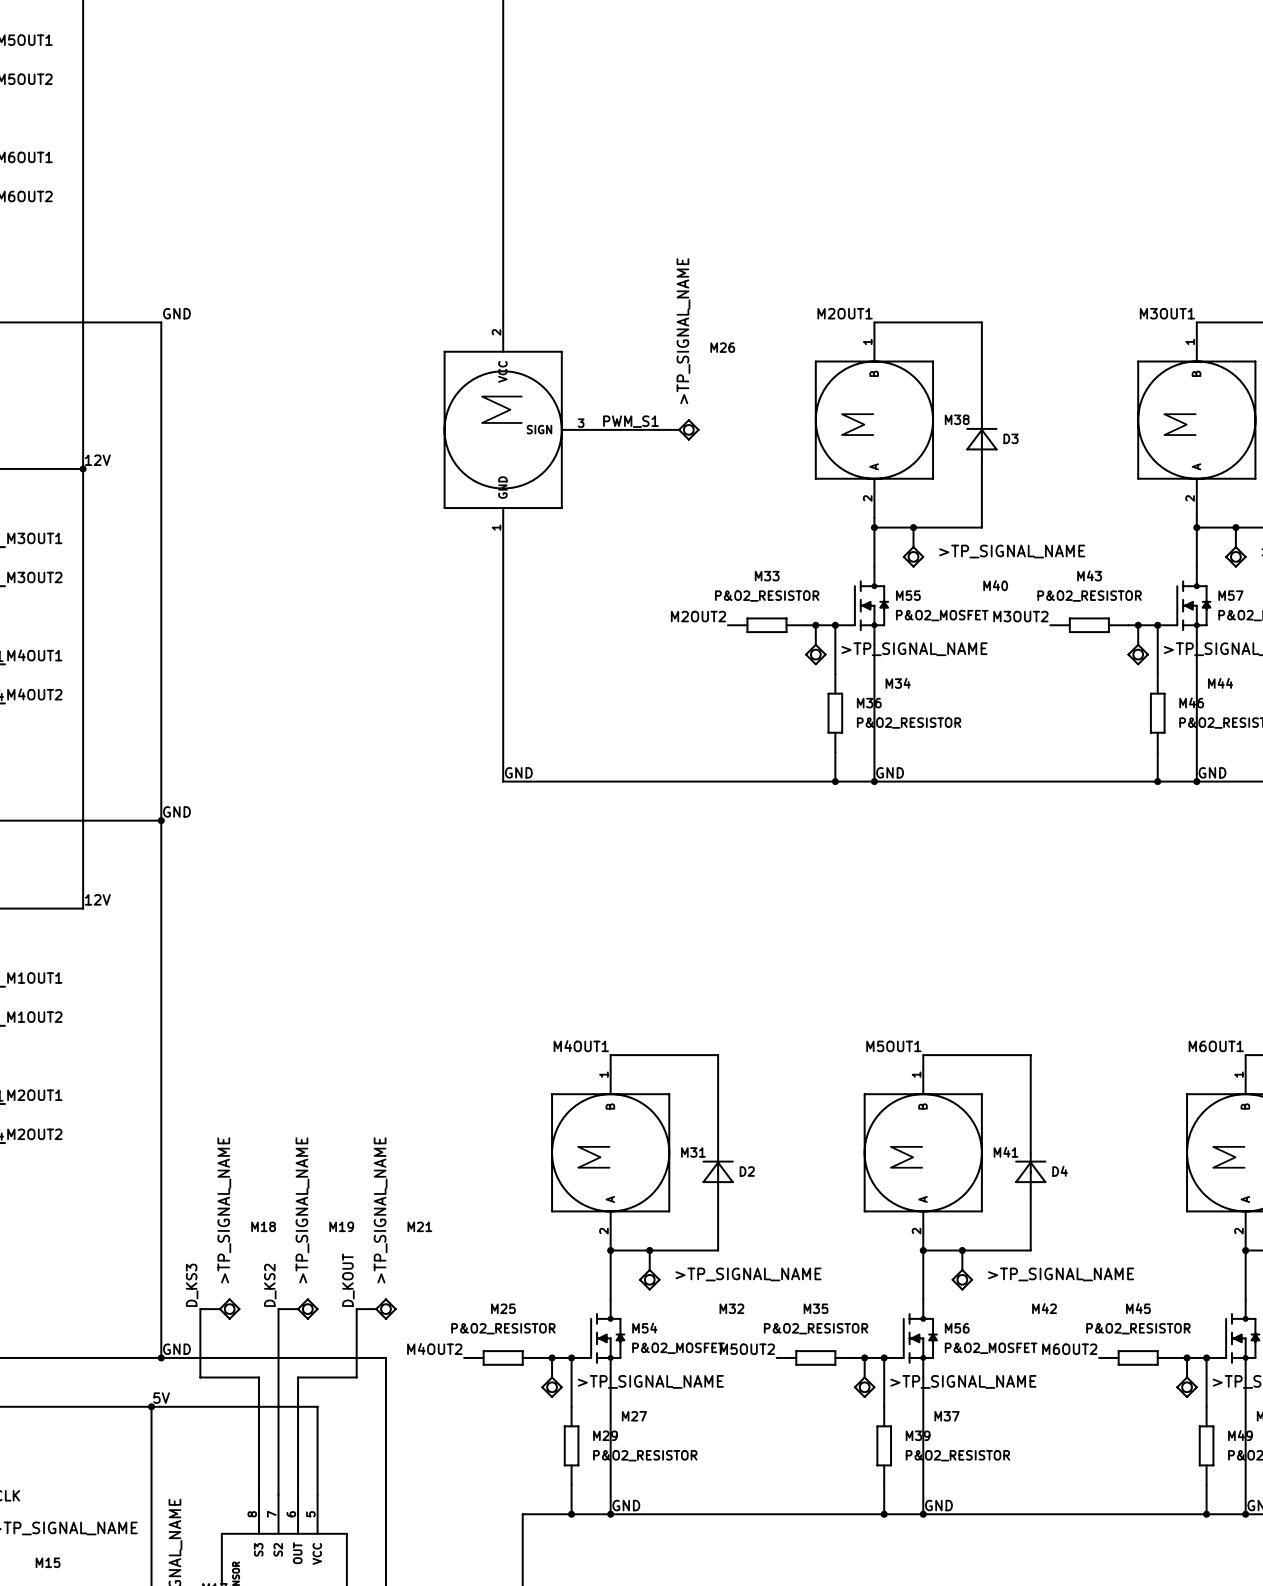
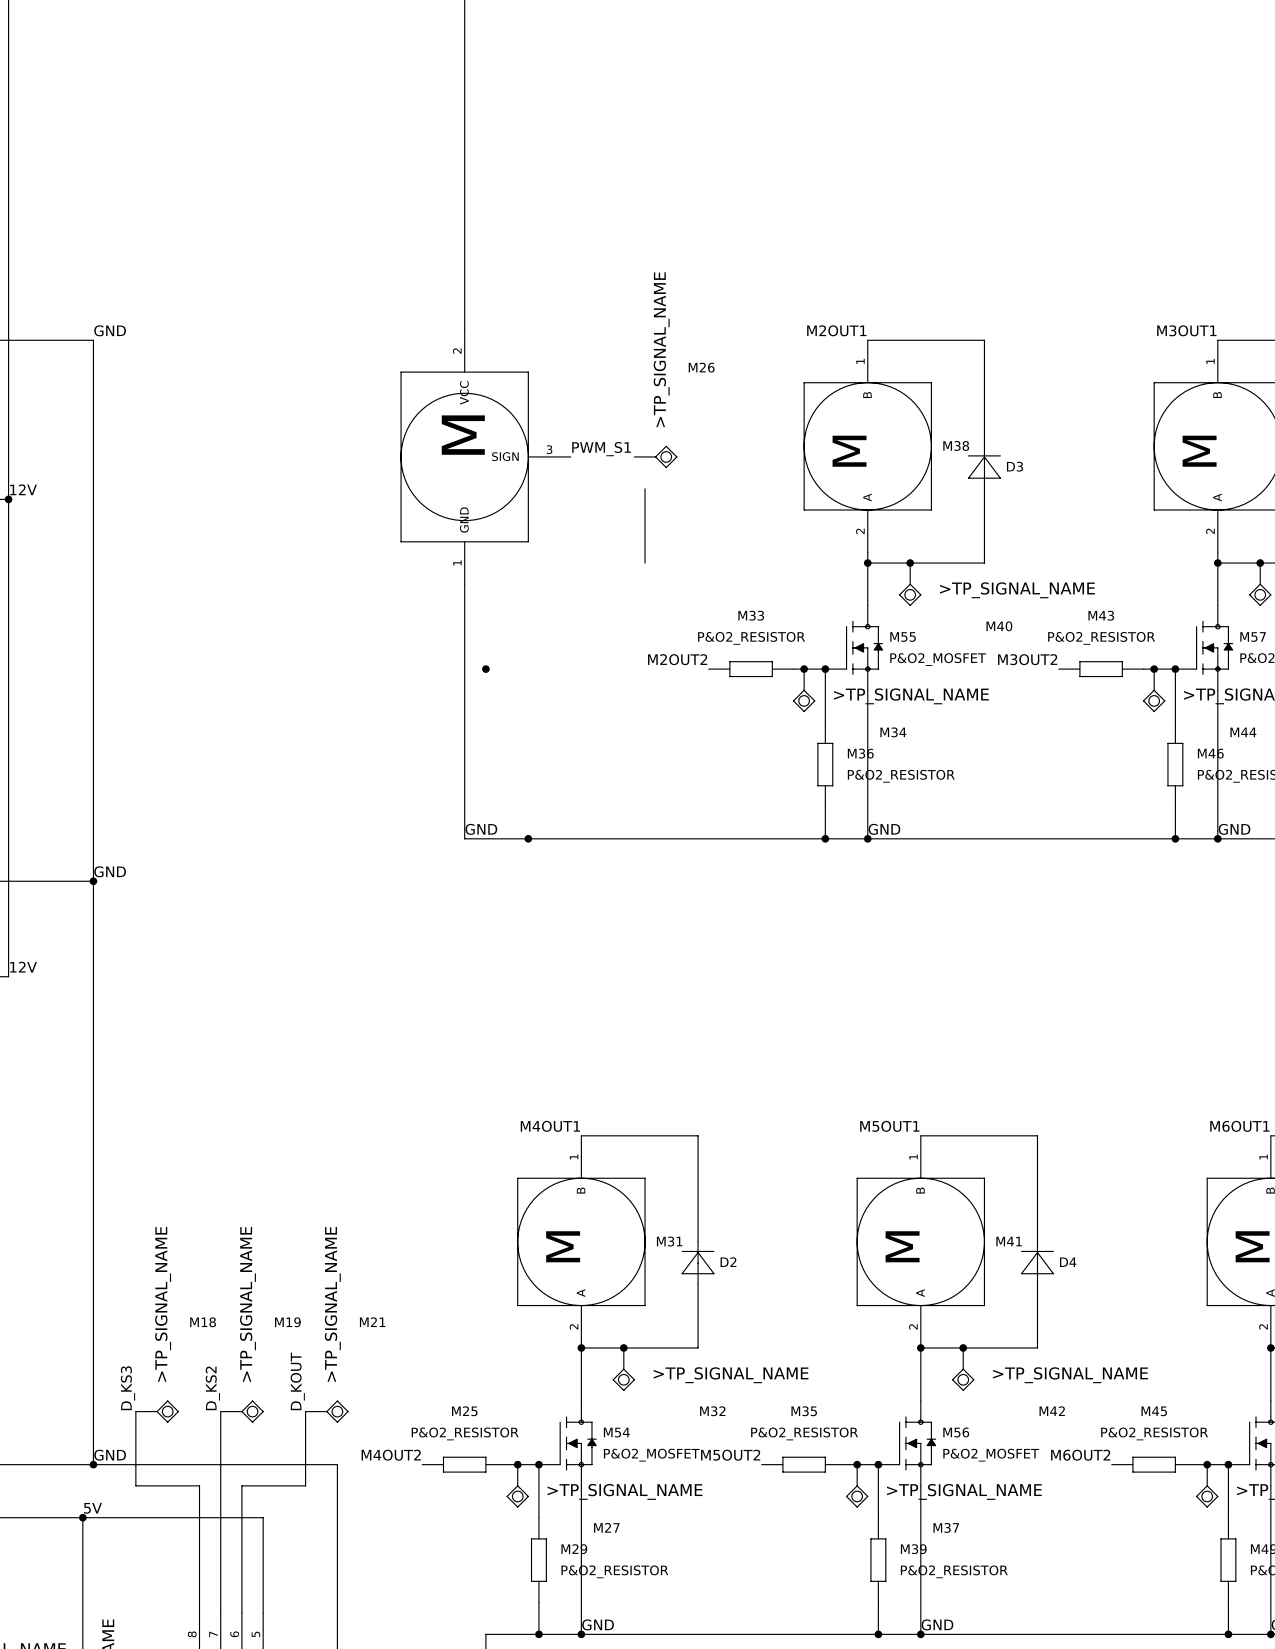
wire: (600, 429) (659, 429) -> none
wire: none -> (645, 488) (645, 563)
junction: none -> (485, 669)
junction: none -> (528, 838)

